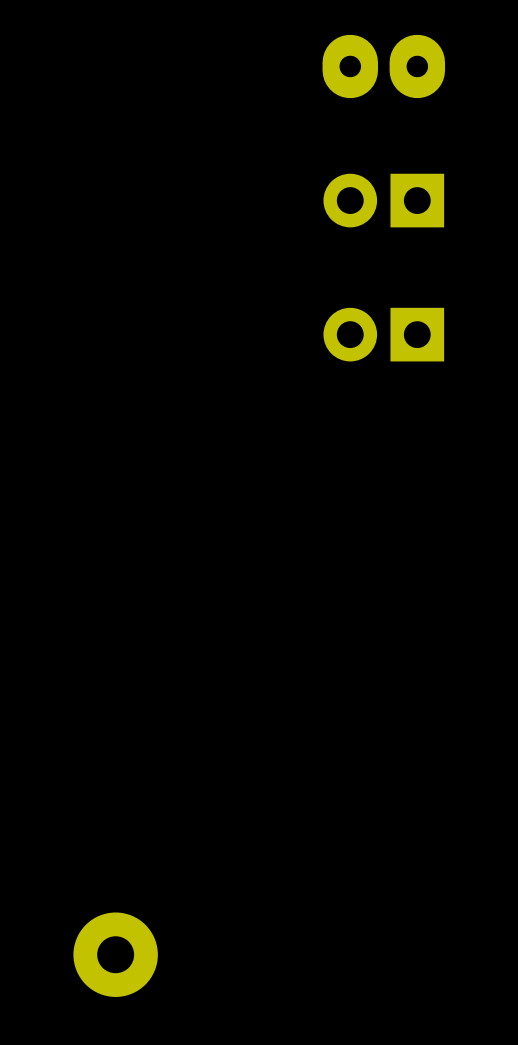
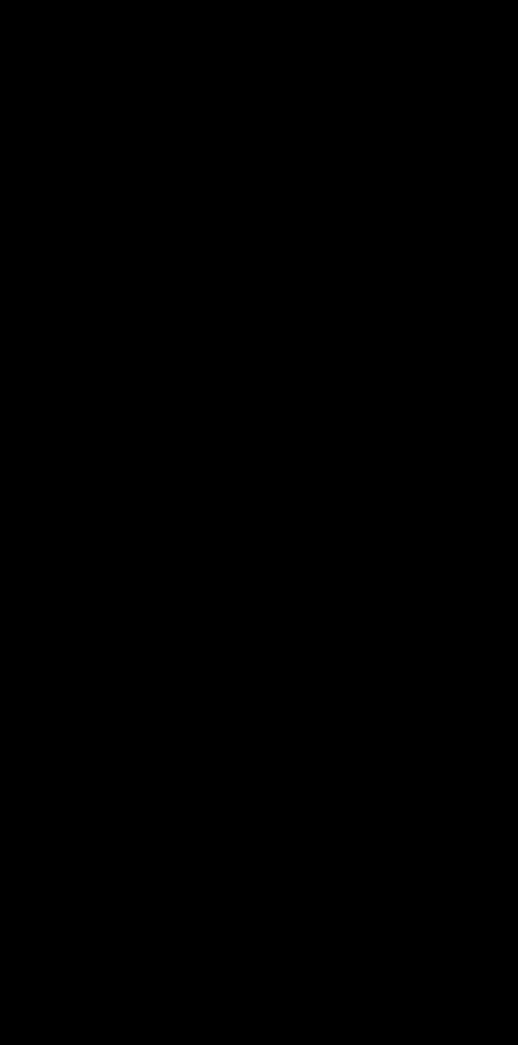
part: (383, 66) -> none
part: (383, 200) -> none
part: (383, 334) -> none
part: (115, 954) -> none

